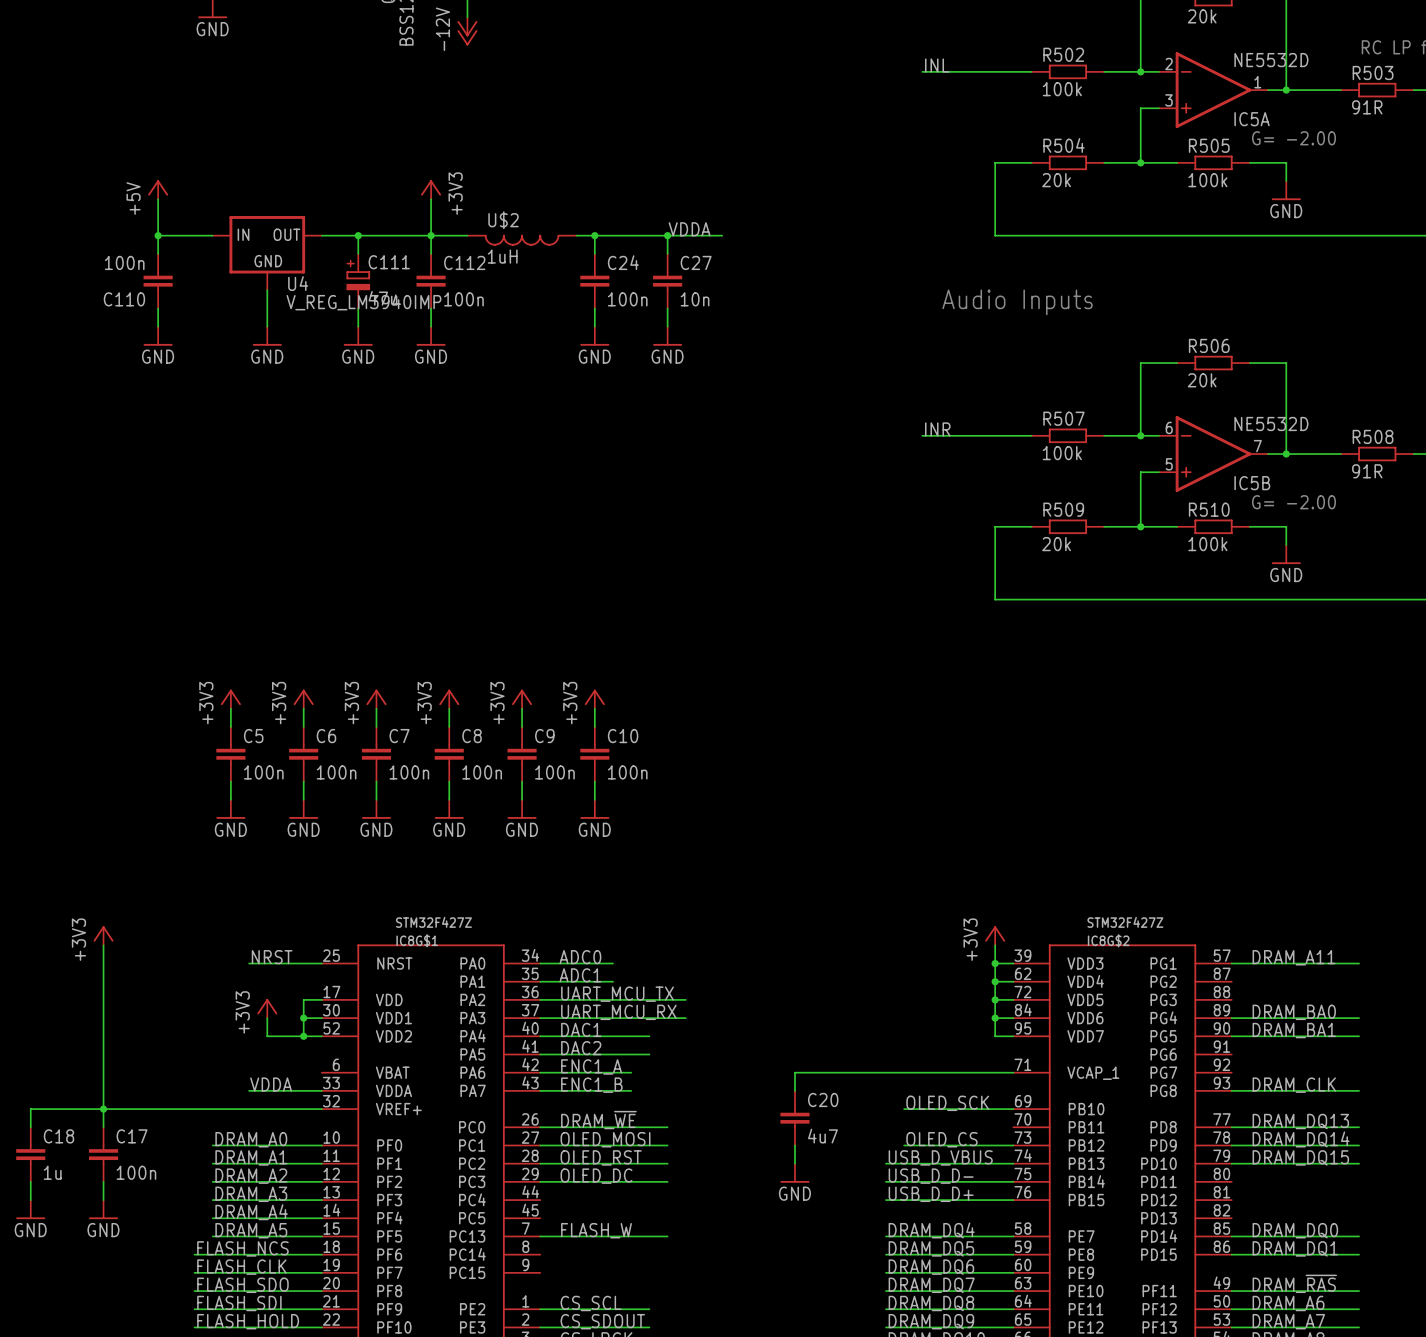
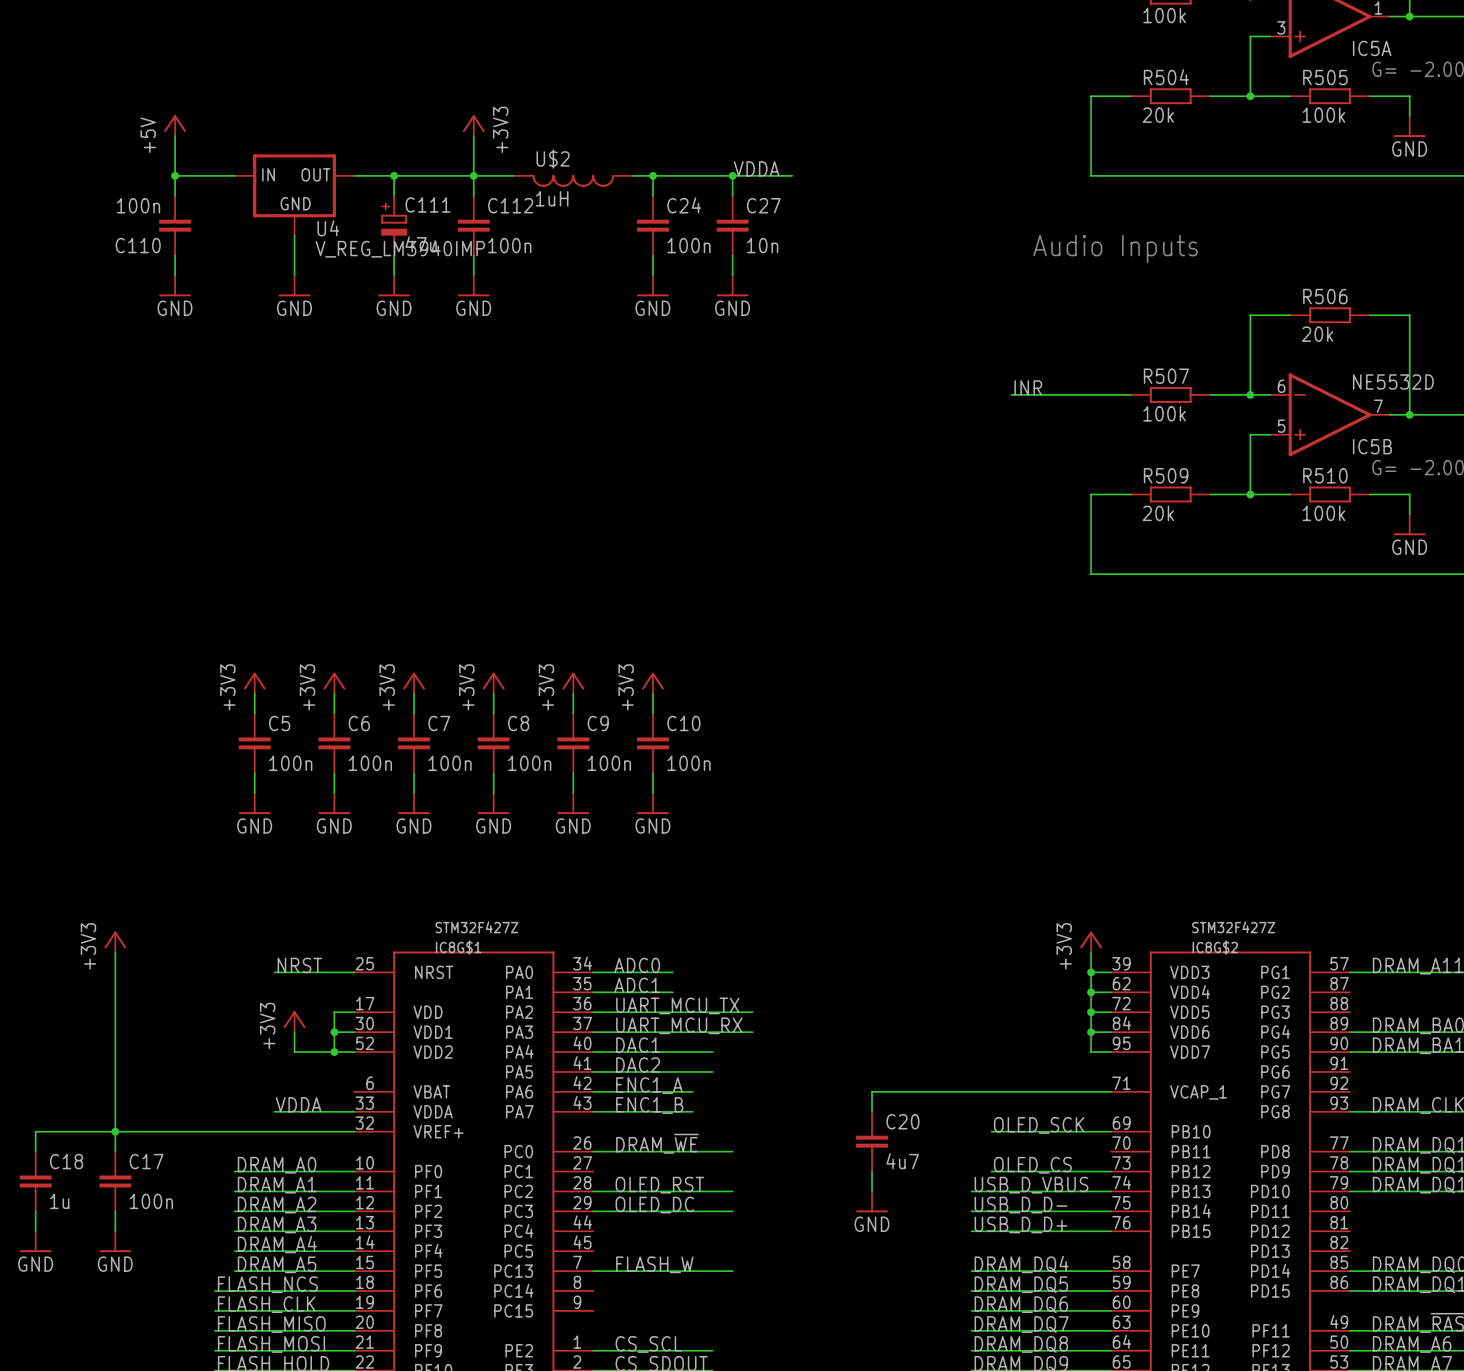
label: OLED_MOSI (605, 1139) -> none
wire: (540, 1145) (667, 1145) -> none
label: FLASH_SDO (242, 1285) -> FLASH_MISO (271, 1324)
label: FLASH_SDI (239, 1303) -> FLASH_MOSI (271, 1344)

